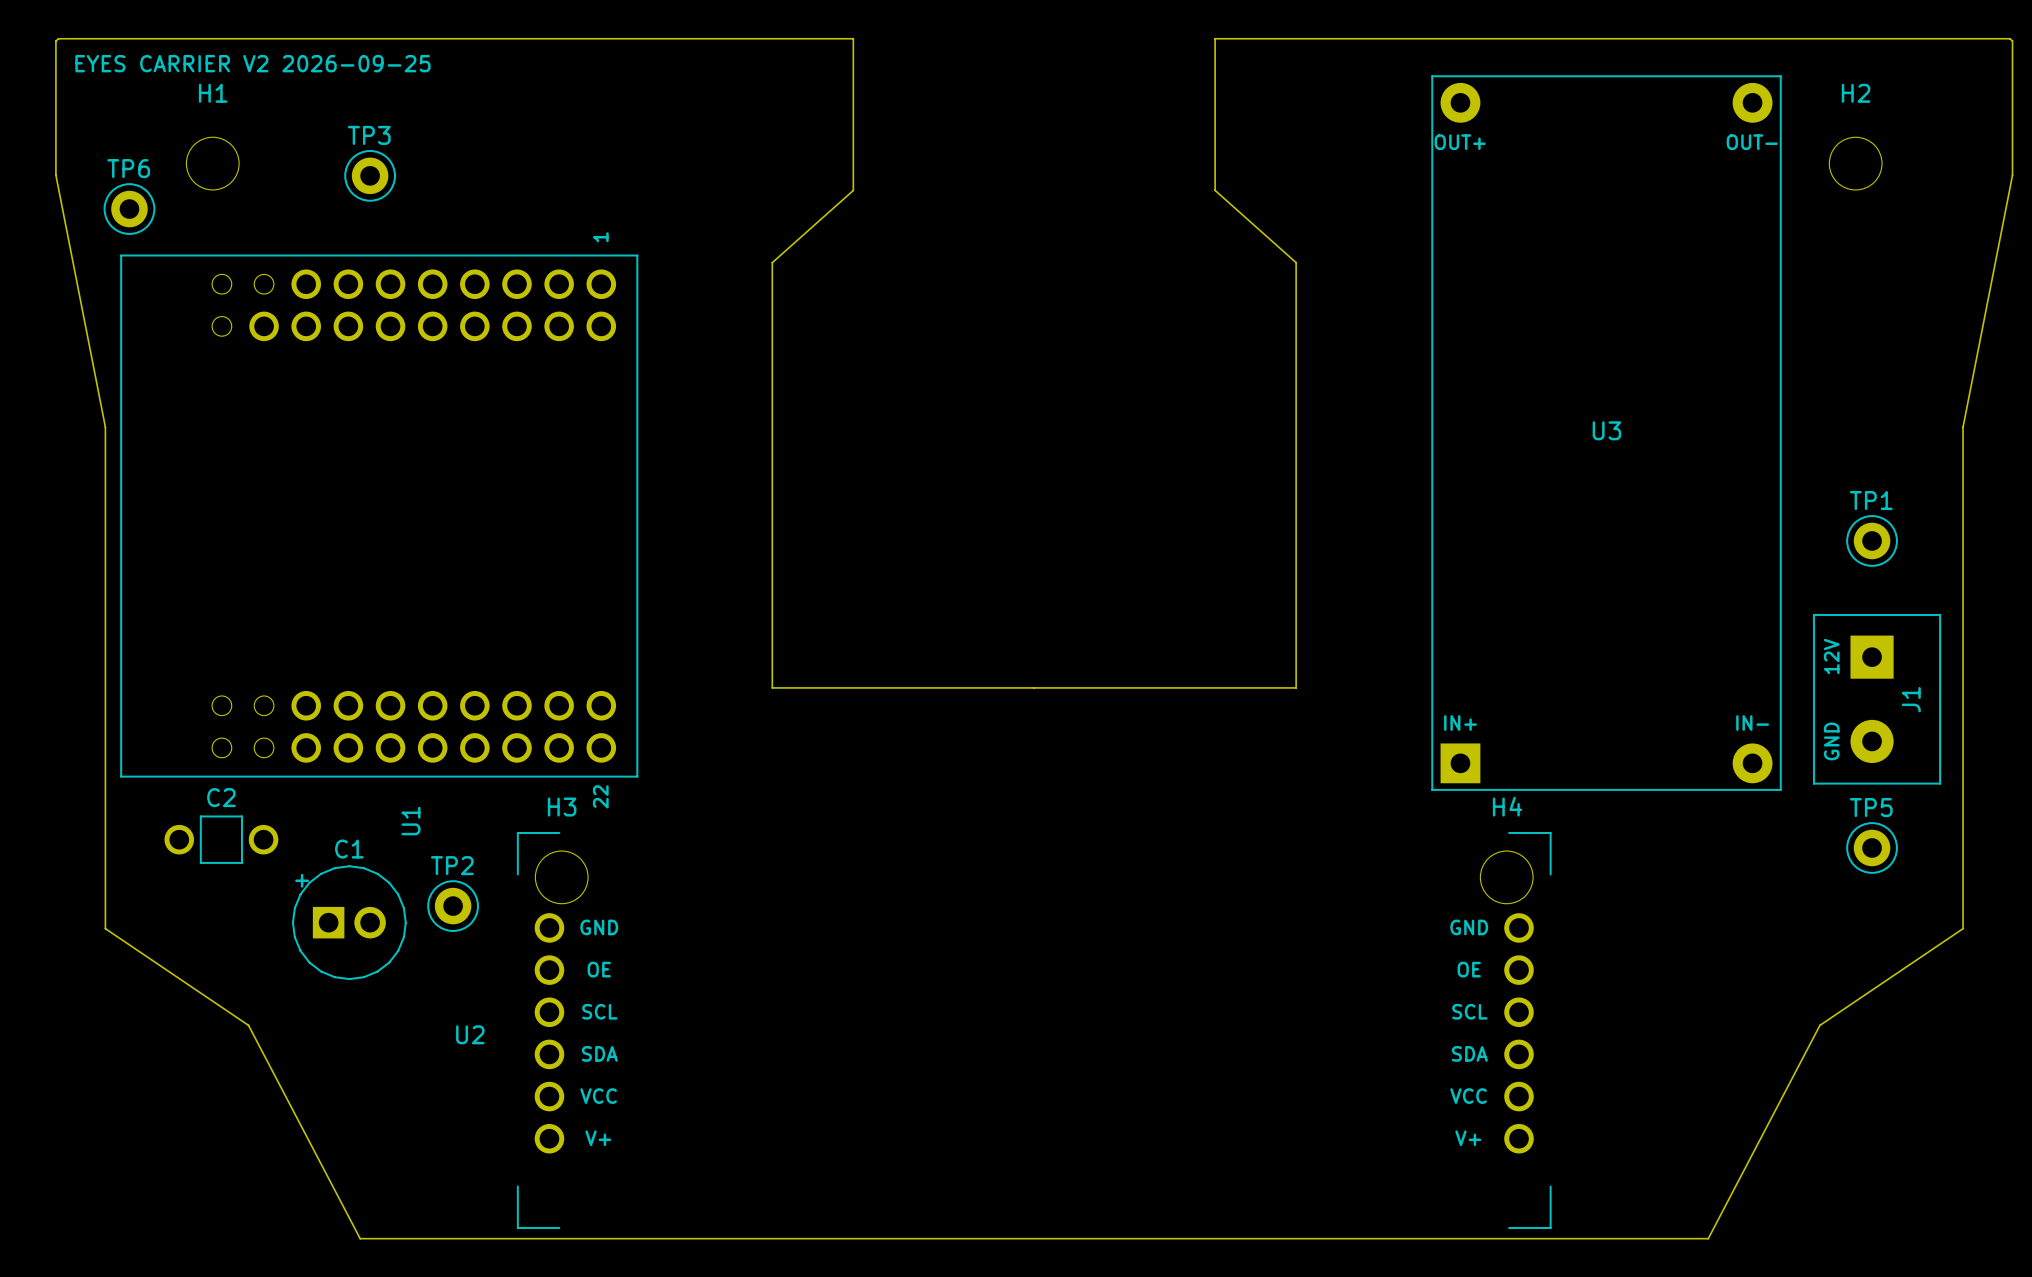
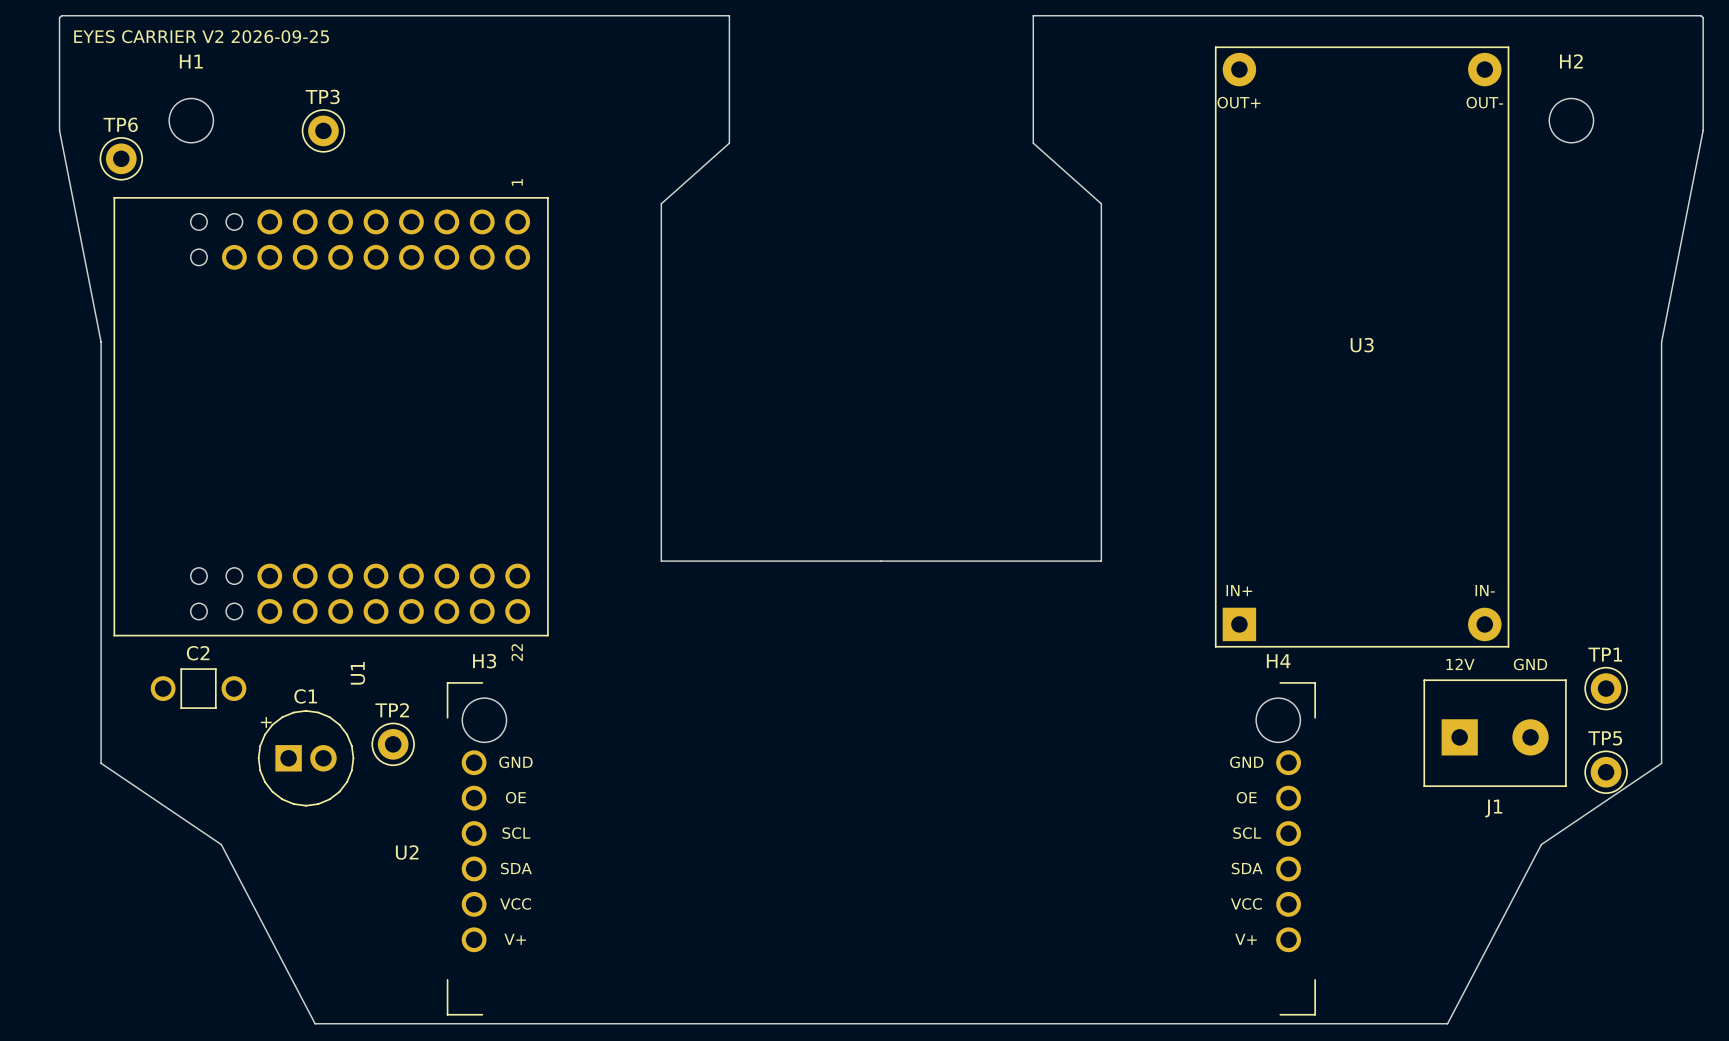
TP1 position: (1872, 540) -> (1606, 688)
J1 footprint: [1812, 613, 1942, 785] -> [1423, 679, 1567, 788]
J1 name position: J1 (1911, 699) -> J1 (1493, 808)
TP5 position: (1872, 847) -> (1606, 772)

